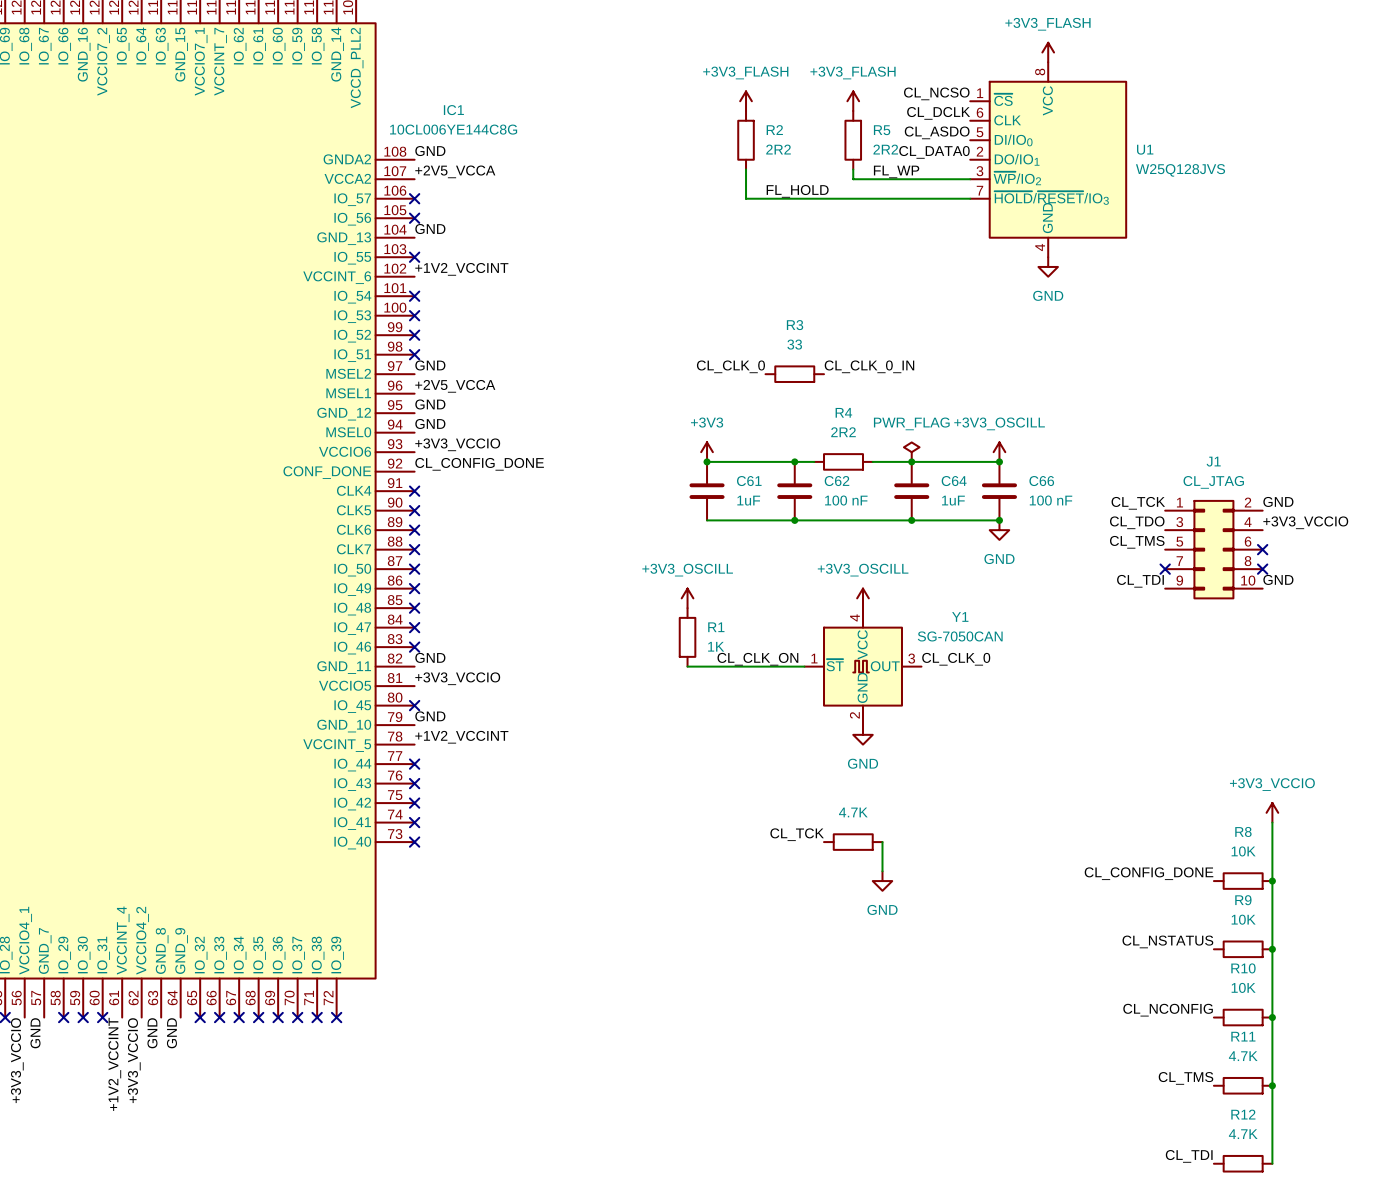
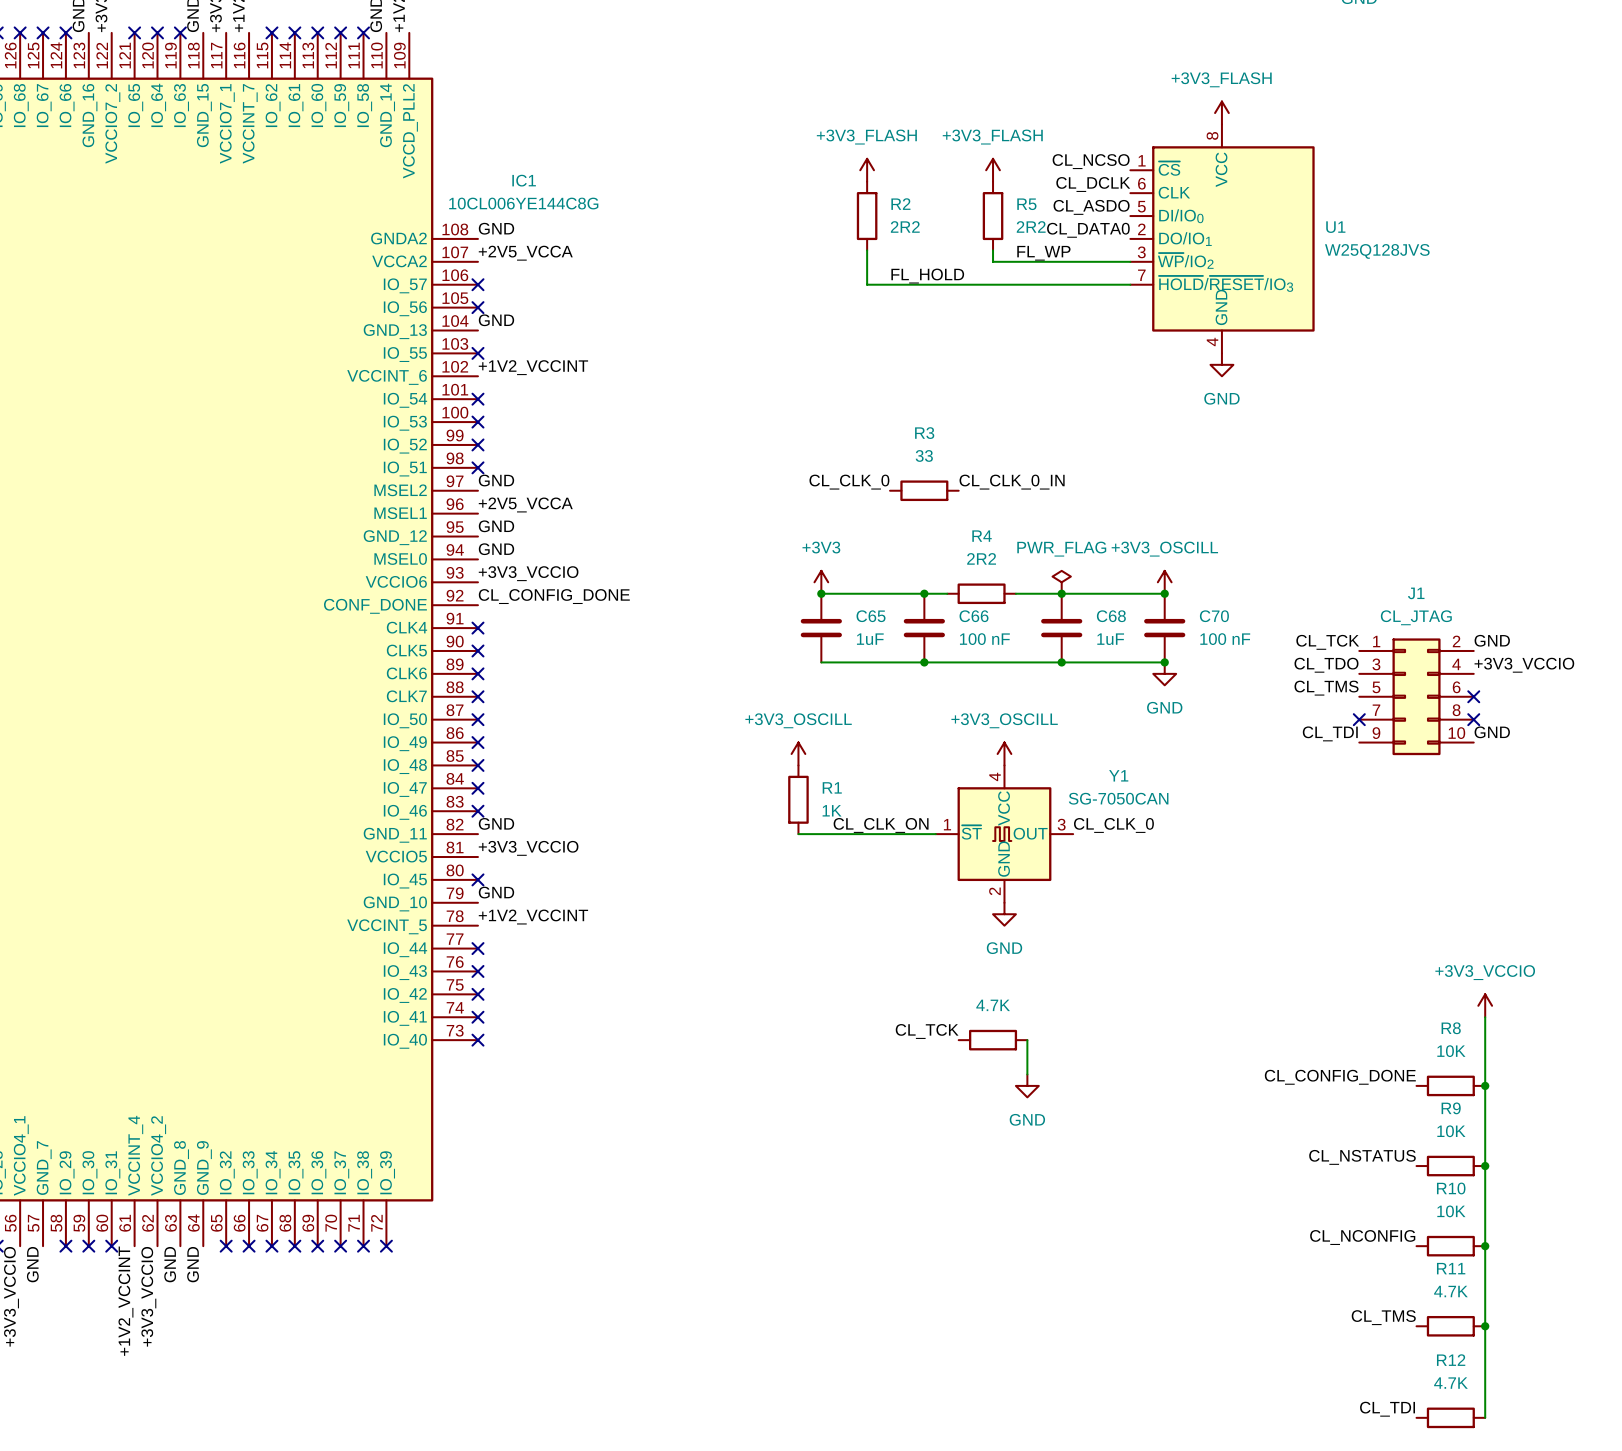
C61 name: C61 (749, 481) -> C65 (871, 616)
C62 name: C62 (837, 481) -> C66 (974, 616)
C64 name: C64 (954, 481) -> C68 (1111, 616)
C66 name: C66 (1041, 481) -> C70 (1214, 616)

